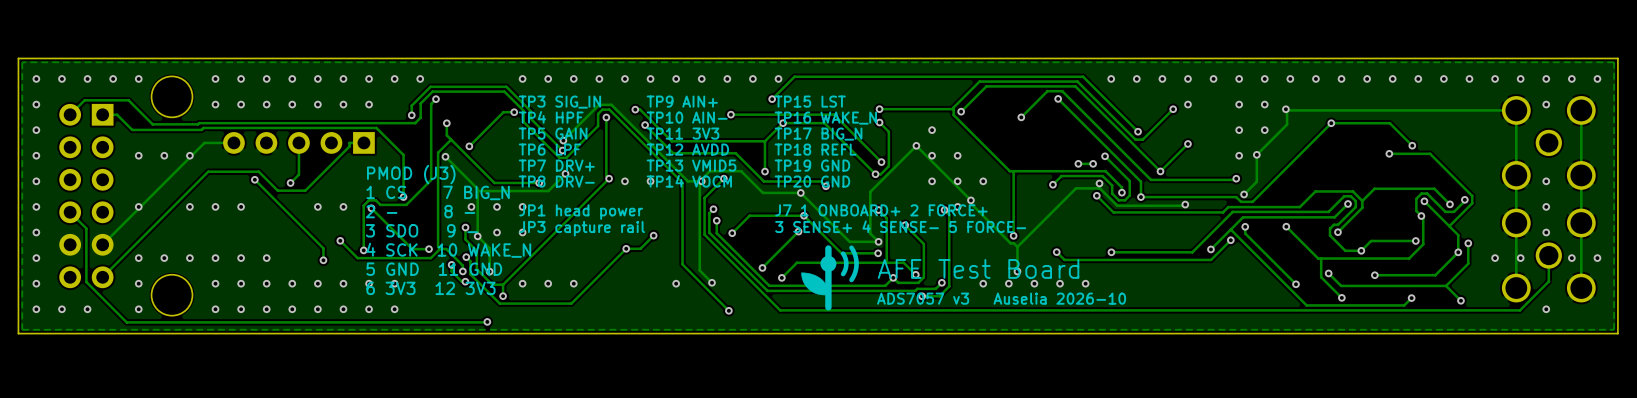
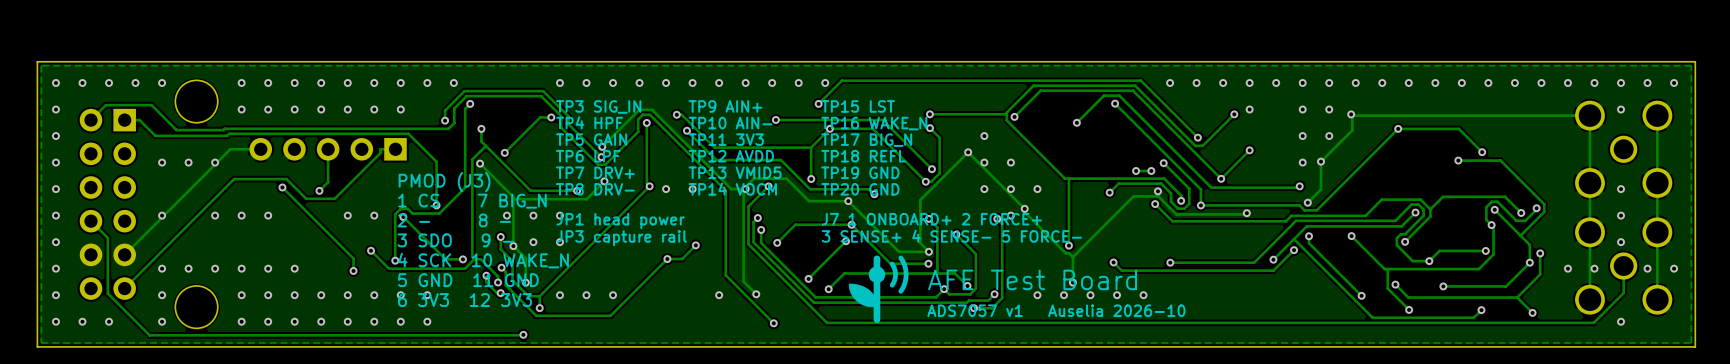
text: ADS7057 v3 Auselia 2026-10 (1001, 298) -> ADS7057 v1 Auselia 2026-10 (1056, 310)

